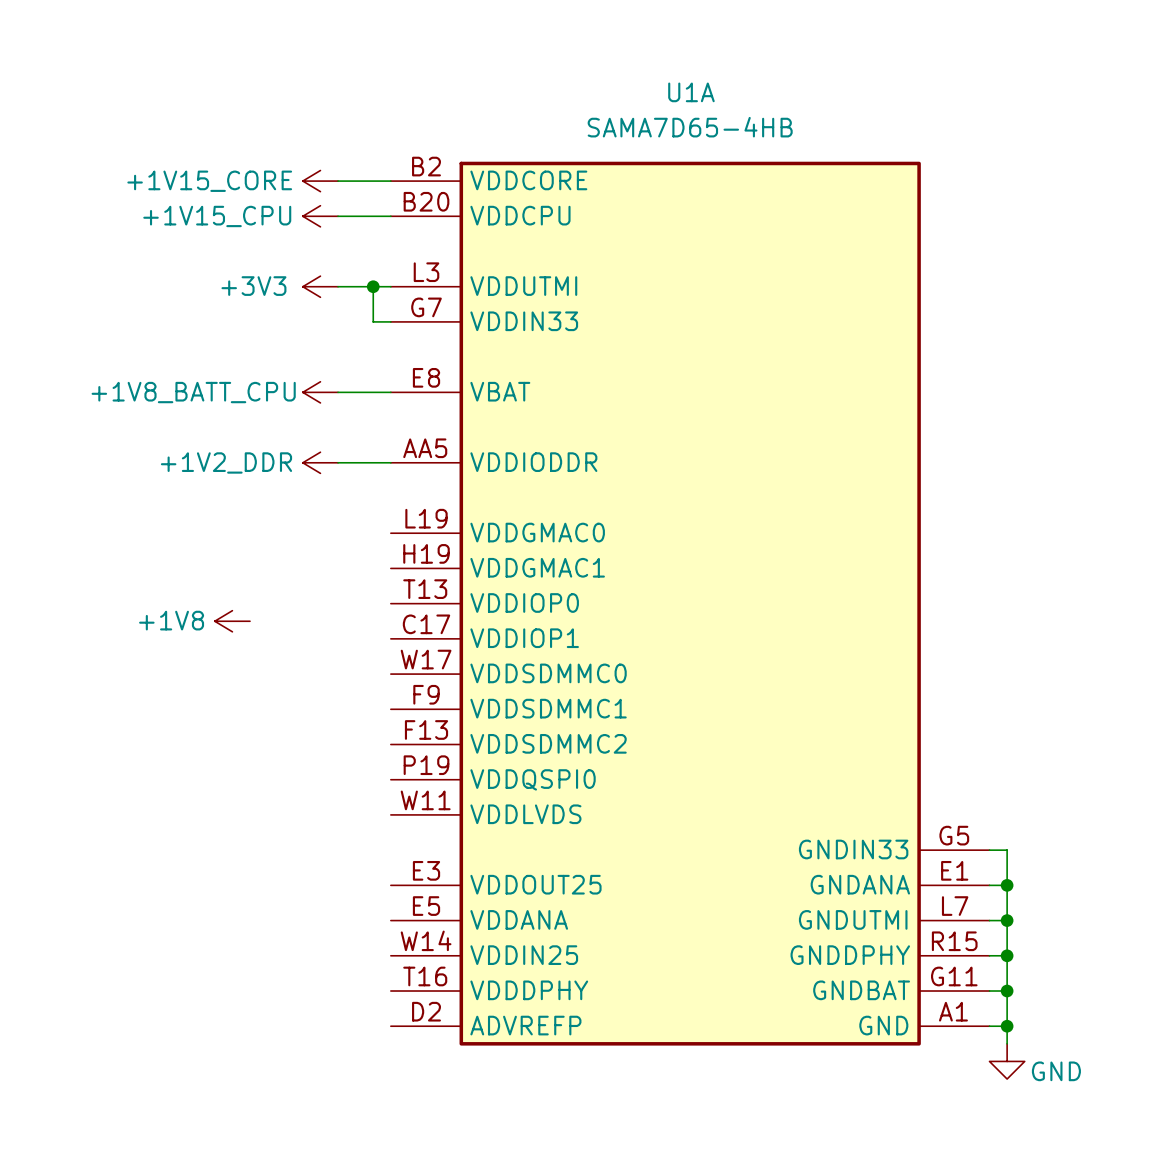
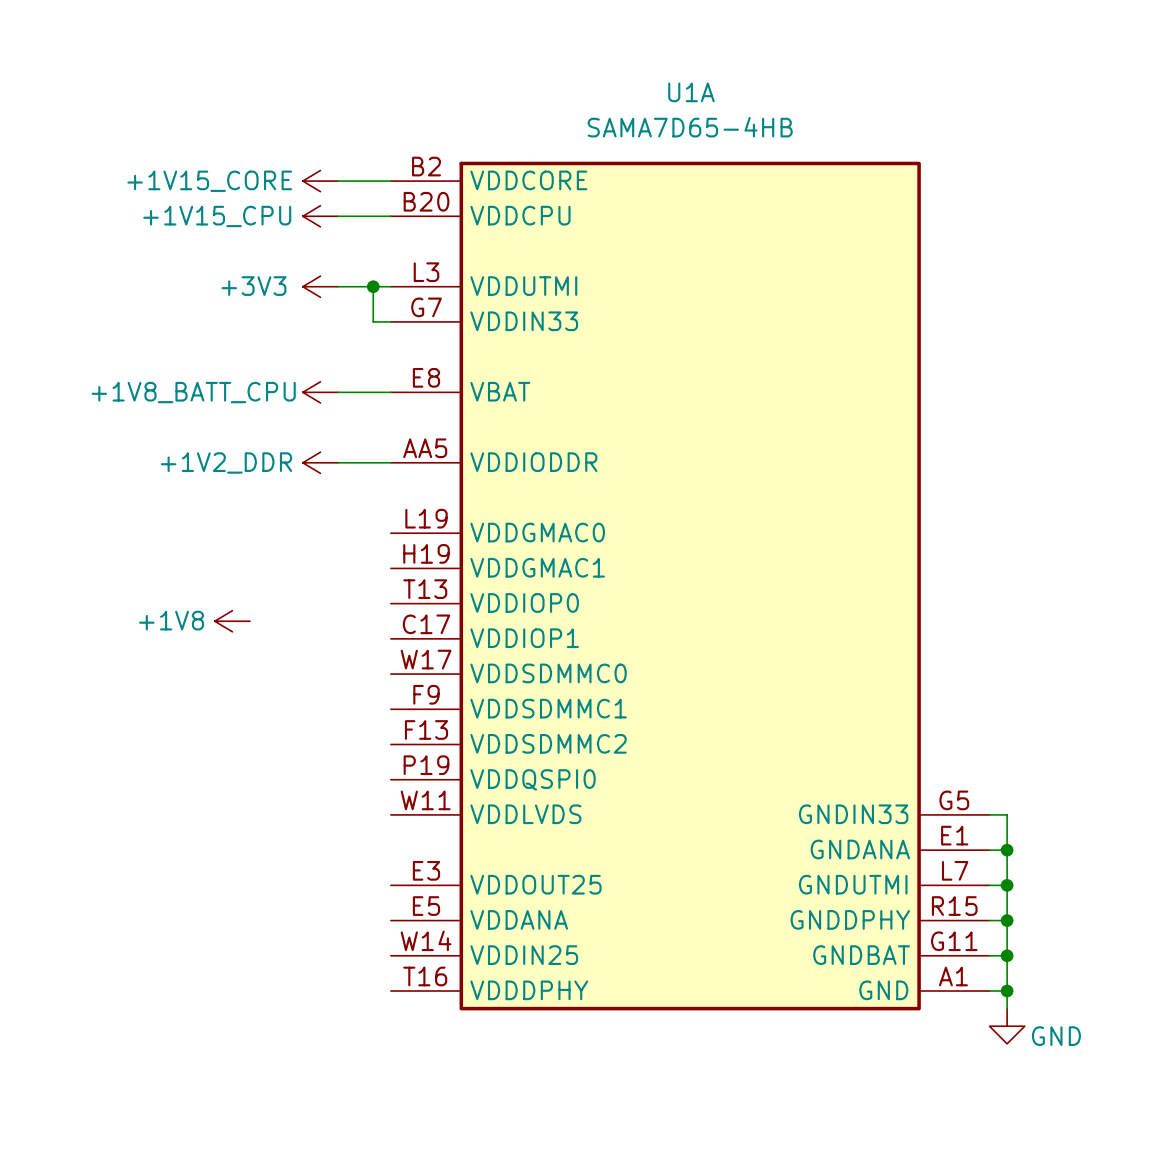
U1A symbol: [390, 161, 990, 1046] -> [390, 161, 990, 1011]
wire: none -> (989, 814) (1007, 814) (1007, 850)
junction: none -> (1007, 850)
junction: (1007, 1026) -> none
power symbol position: GND (1007, 1061) -> GND (1007, 1026)

